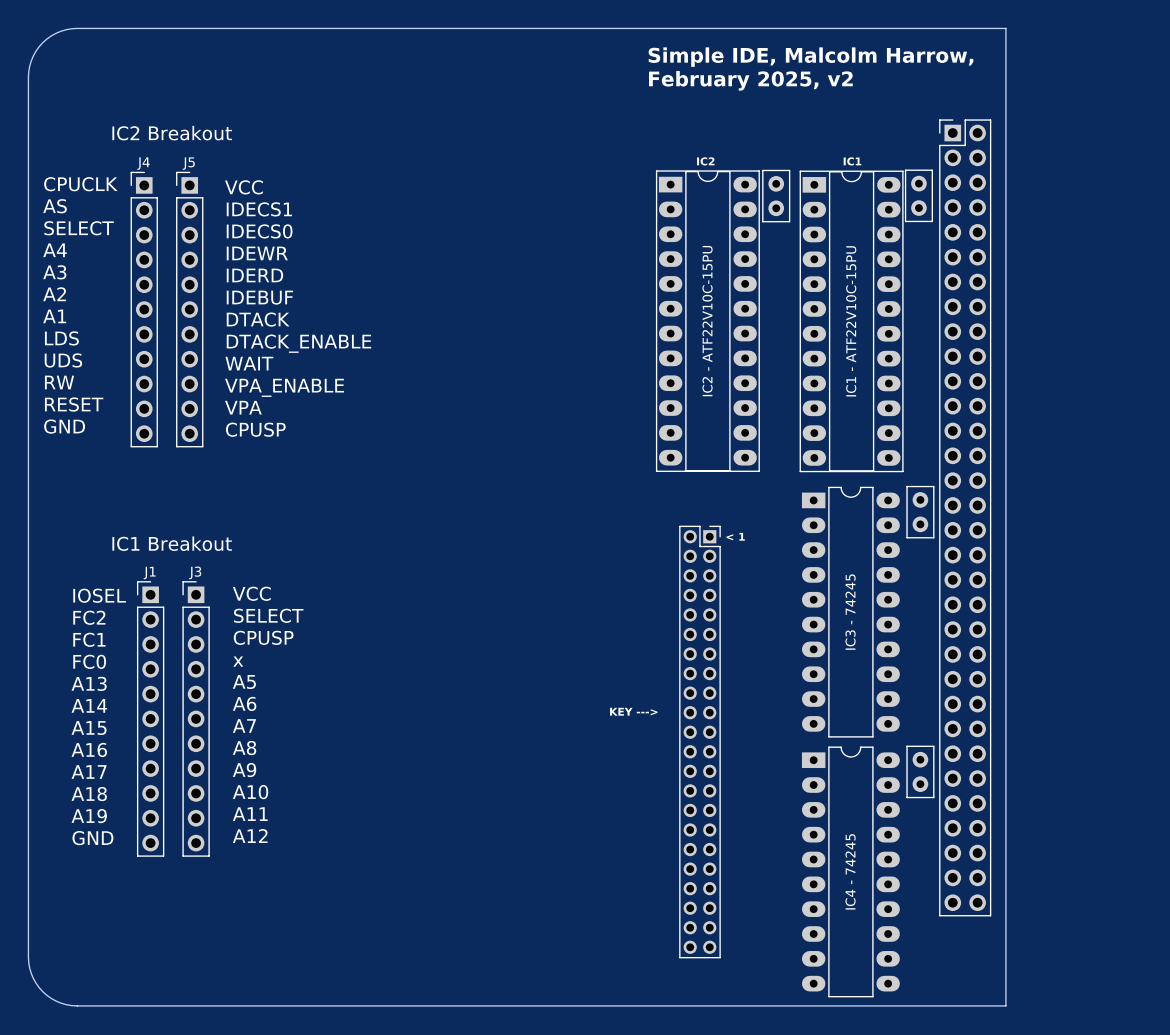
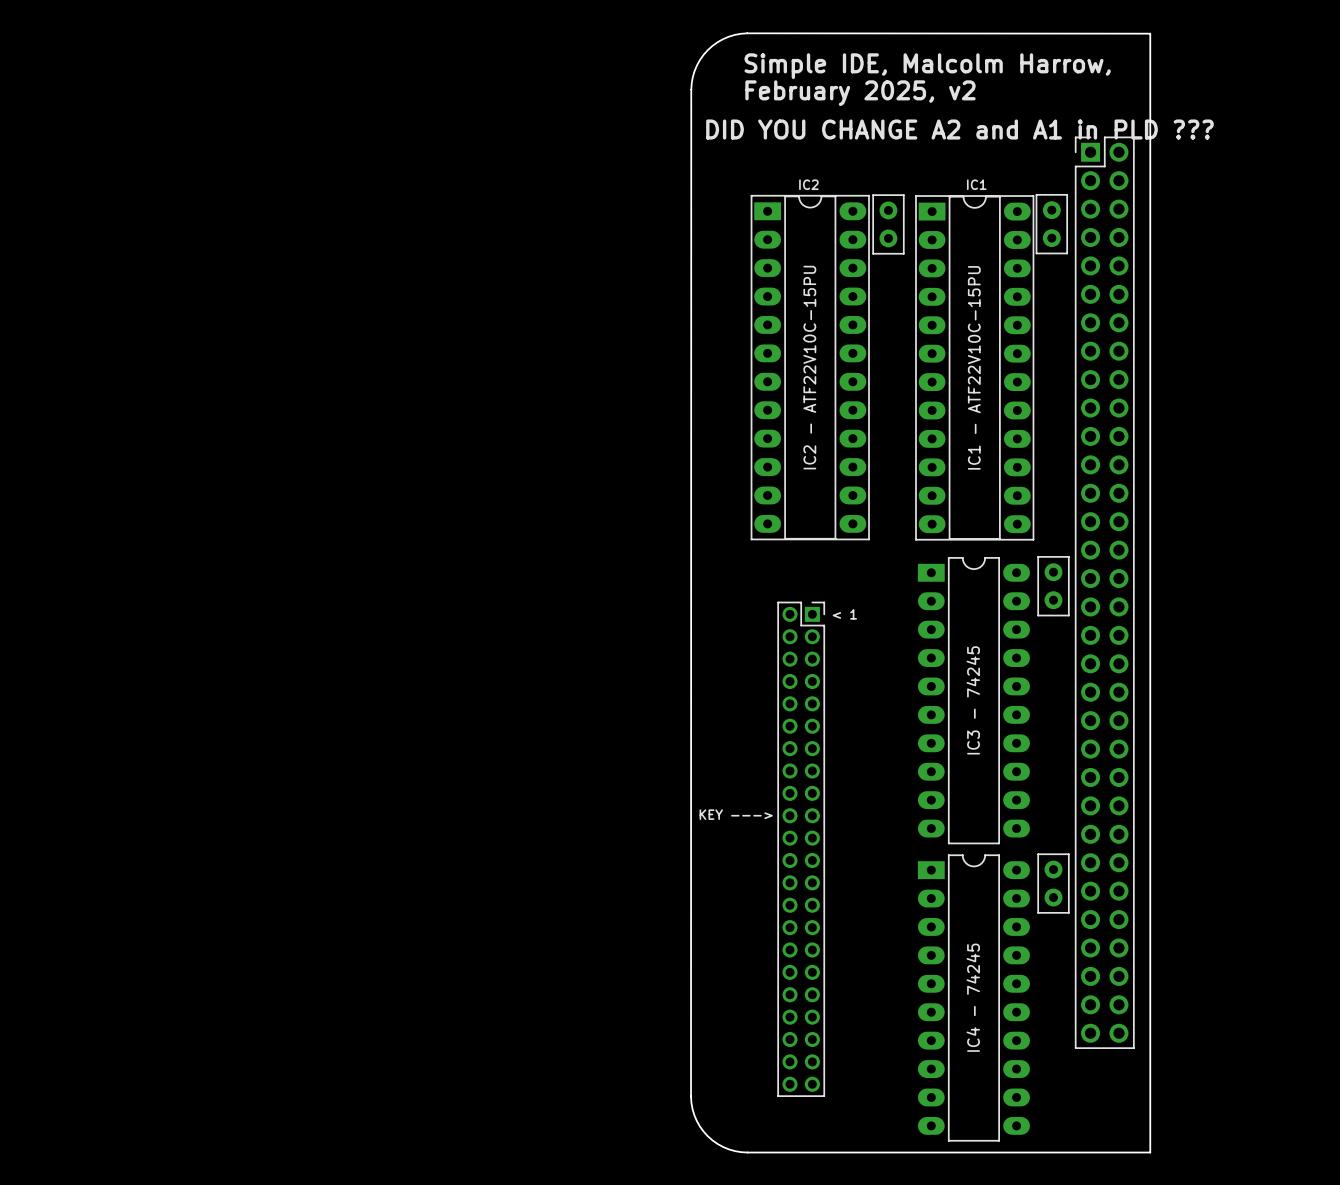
board edge: (77, 28) (1005, 28) (1005, 1005) (77, 1005) (61, 1003) (42, 991) (31, 973) (28, 957) (28, 77) (33, 56) (42, 42) (56, 33) (77, 28) -> none
board edge: none -> (1150, 33) (740, 33) (717, 42) (703, 54) (694, 71) (691, 89)
board edge: none -> (1150, 33) (1150, 1152) (741, 1152) (717, 1143) (703, 1131) (696, 1120) (691, 1096) (691, 89)
text: none -> DID YOU CHANGE A2 and A1 in PLD ??? (959, 129)
text: IC2 Breakout (172, 133) -> none
text: CPUCLK (80, 184) -> none
text: VCC (244, 187) -> none
text: AS (55, 206) -> none
text: IDECS1 (259, 209) -> none
text: SELECT (79, 228) -> none
text: IDECS0 (259, 231) -> none
text: A4 (55, 250) -> none
text: IDEWR (257, 253) -> none
text: A3 (54, 272) -> none
text: IDERD (254, 275) -> none
text: A2 (54, 294) -> none
text: IDEBUF (259, 297) -> none
J4: (144, 309) -> none
J5: (189, 309) -> none
text: A1 (54, 316) -> none
text: DTACK (258, 319) -> none
text: LDS (61, 338) -> none
text: DTACK_ENABLE (298, 343) -> none
text: UDS (63, 360) -> none
text: WAIT (249, 363) -> none
text: RW (59, 382) -> none
text: VPA_ENABLE (284, 387) -> none
text: RESET (74, 404) -> none
text: VPA (243, 407) -> none
text: GND (64, 426) -> none
text: CPUSP (255, 429) -> none
text: IC1 Breakout (172, 543) -> none
text: VCC (251, 593) -> none
text: IOSEL (99, 595) -> none
text: SELECT (268, 615) -> none
text: FC2 (89, 617) -> none
text: CPUSP (263, 637) -> none
text: FC1 (89, 639) -> none
text: FC0 (89, 661) -> none
text: x (238, 661) -> none
text: A5 (244, 682) -> none
text: A13 (89, 683) -> none
text: A6 (244, 703) -> none
text: A14 (89, 705) -> none
J1: (150, 718) -> none
J3: (196, 718) -> none
text: A7 (244, 725) -> none
text: A15 (89, 728) -> none
text: A8 (244, 748) -> none
text: A16 (89, 749) -> none
text: A9 (244, 770) -> none
text: A17 (89, 771) -> none
text: A10 (250, 792) -> none
text: A18 (89, 794) -> none
text: A11 (250, 814) -> none
text: A19 (89, 816) -> none
text: A12 (250, 836) -> none
text: GND (92, 838) -> none

